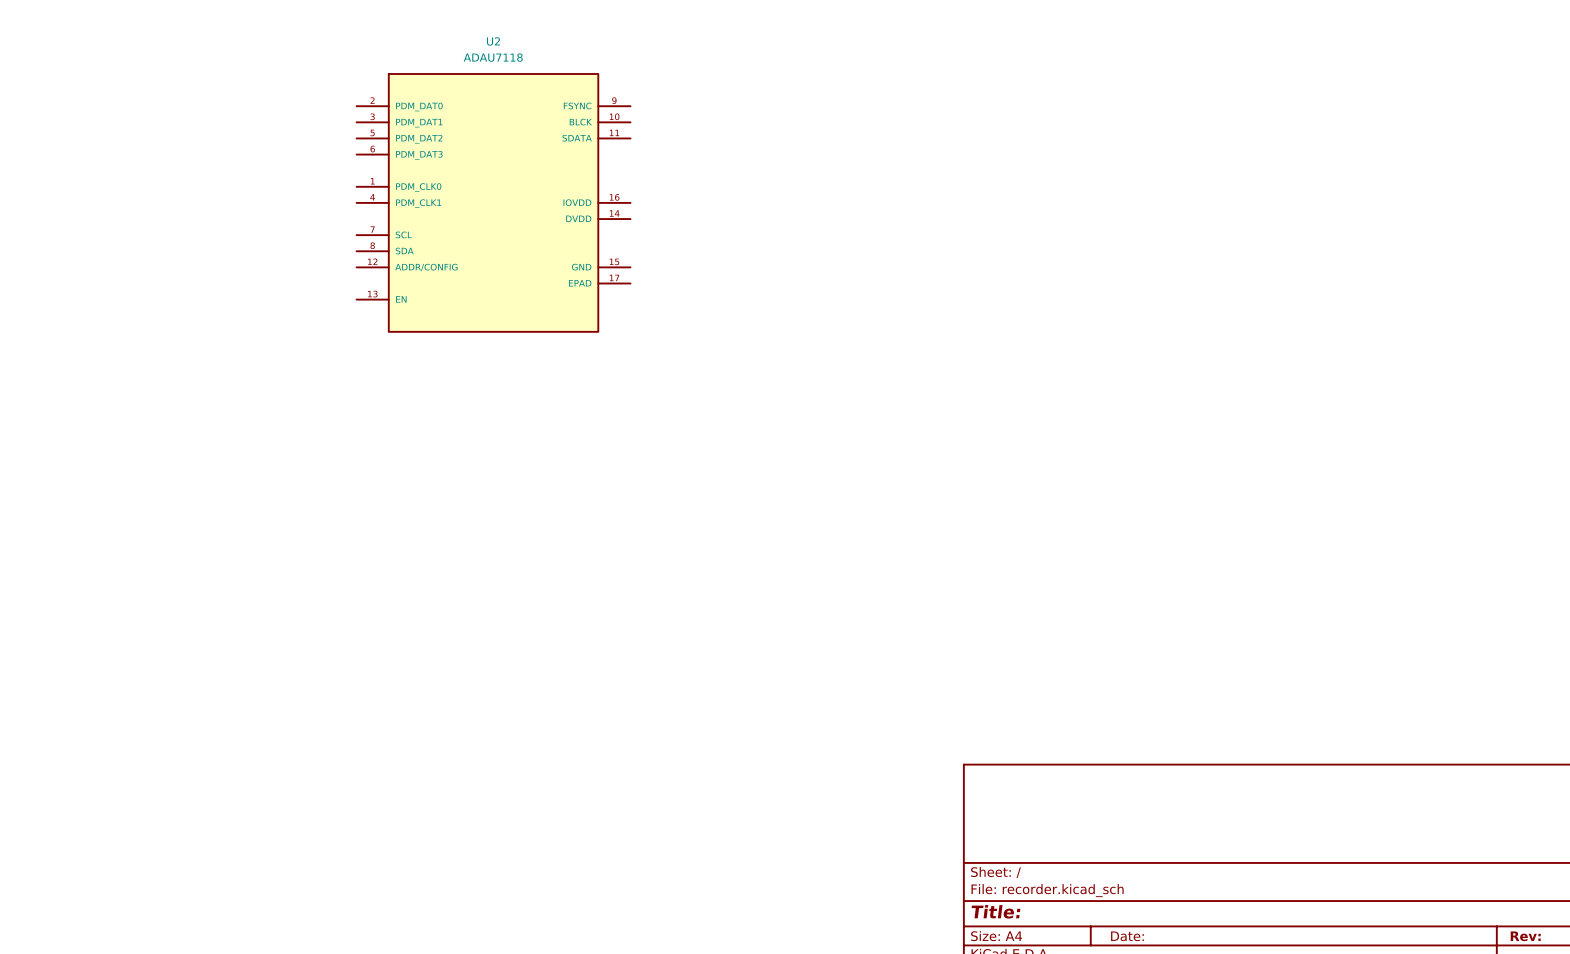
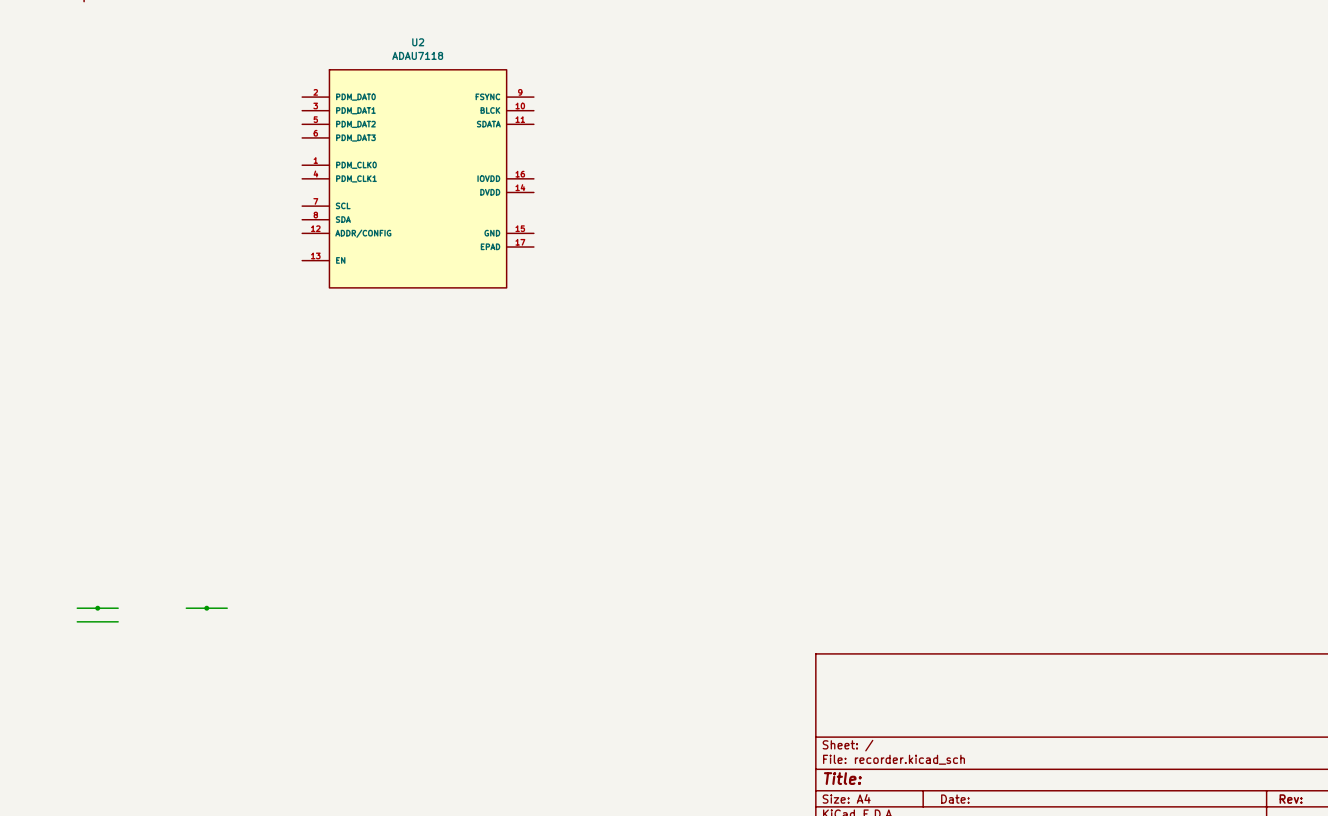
wire: none -> (77, 608) (118, 608)
junction: none -> (97, 608)
wire: none -> (186, 608) (227, 608)
junction: none -> (206, 608)
wire: none -> (77, 621) (118, 621)

